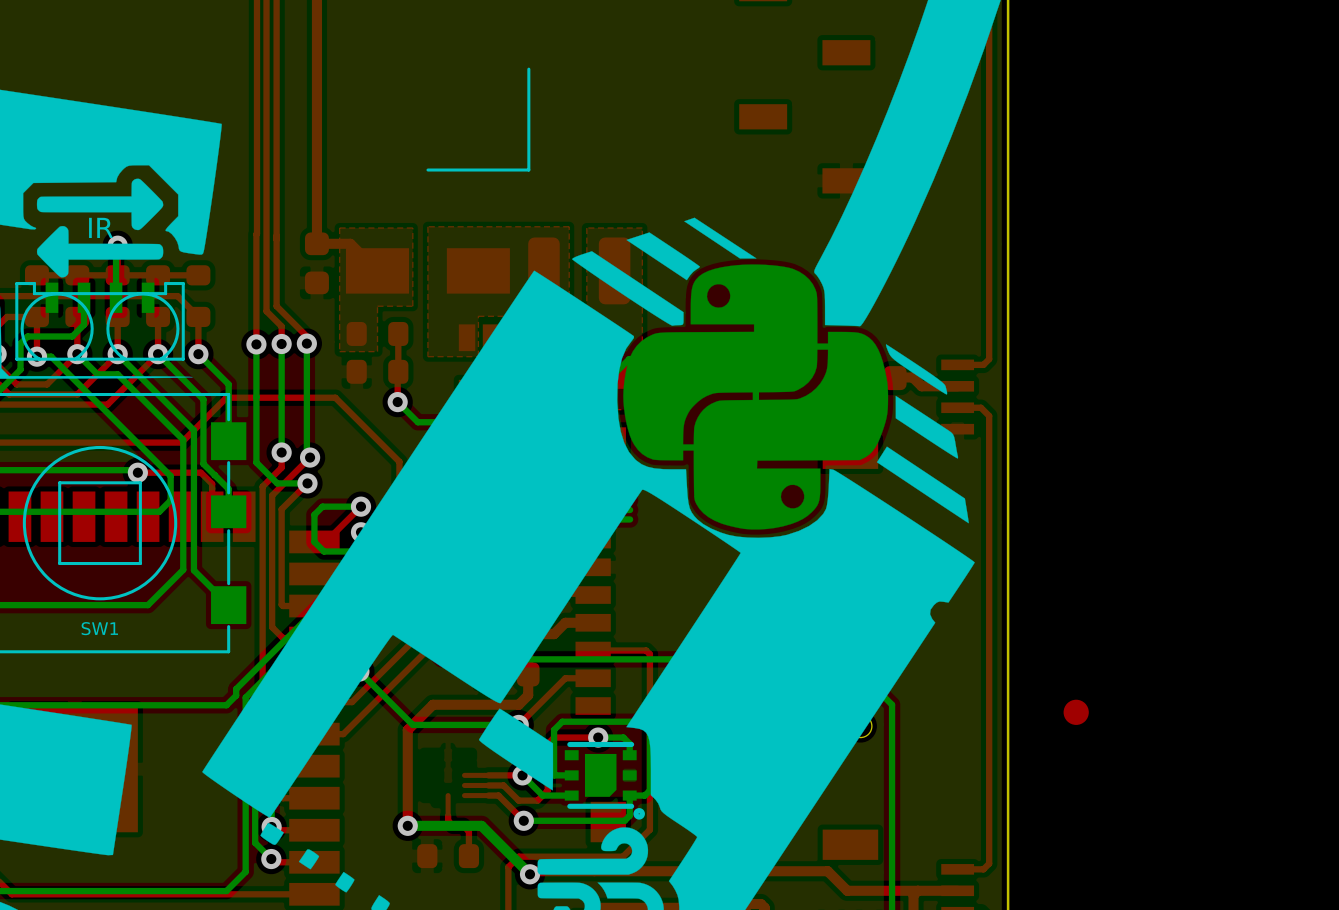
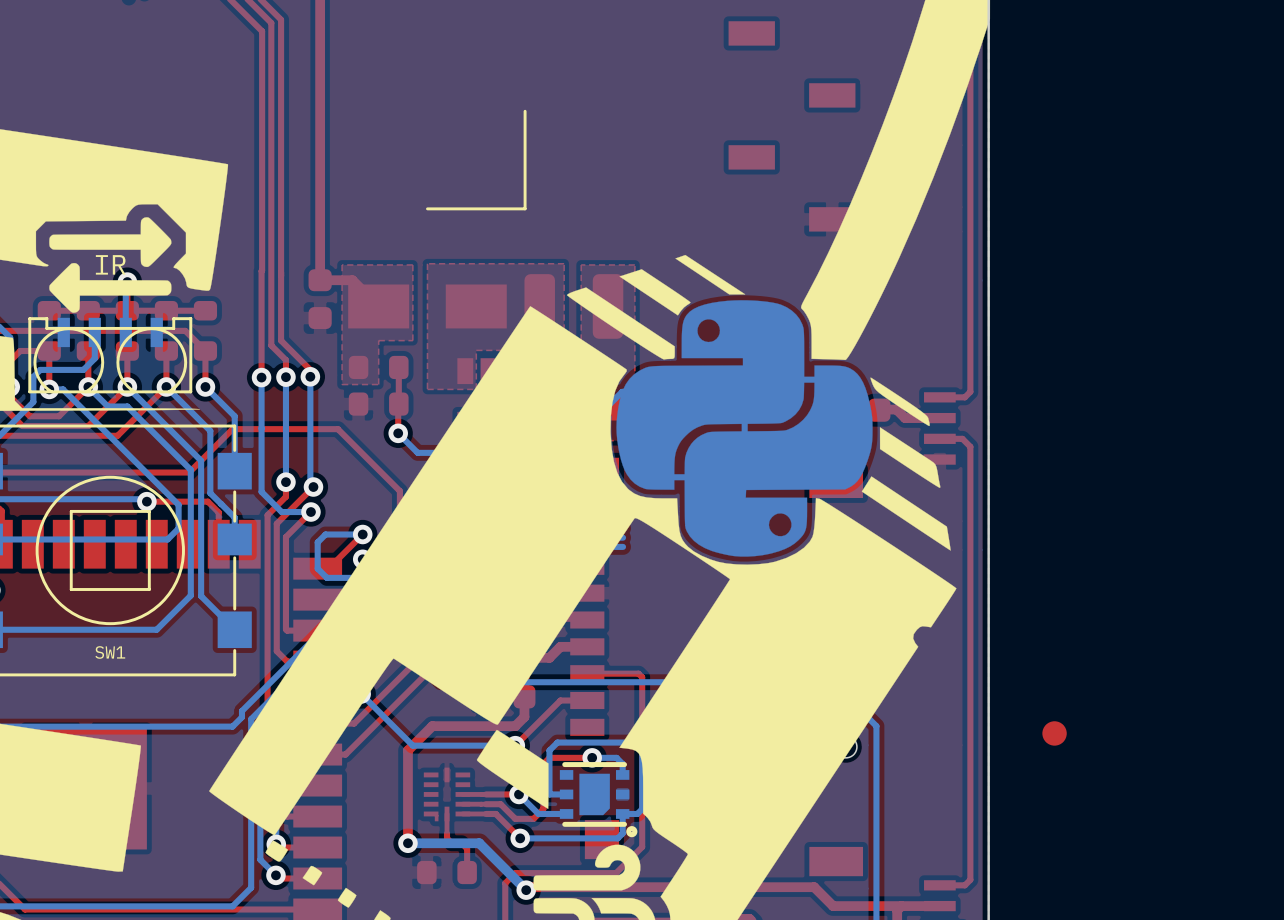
part: none -> (447, 794)

